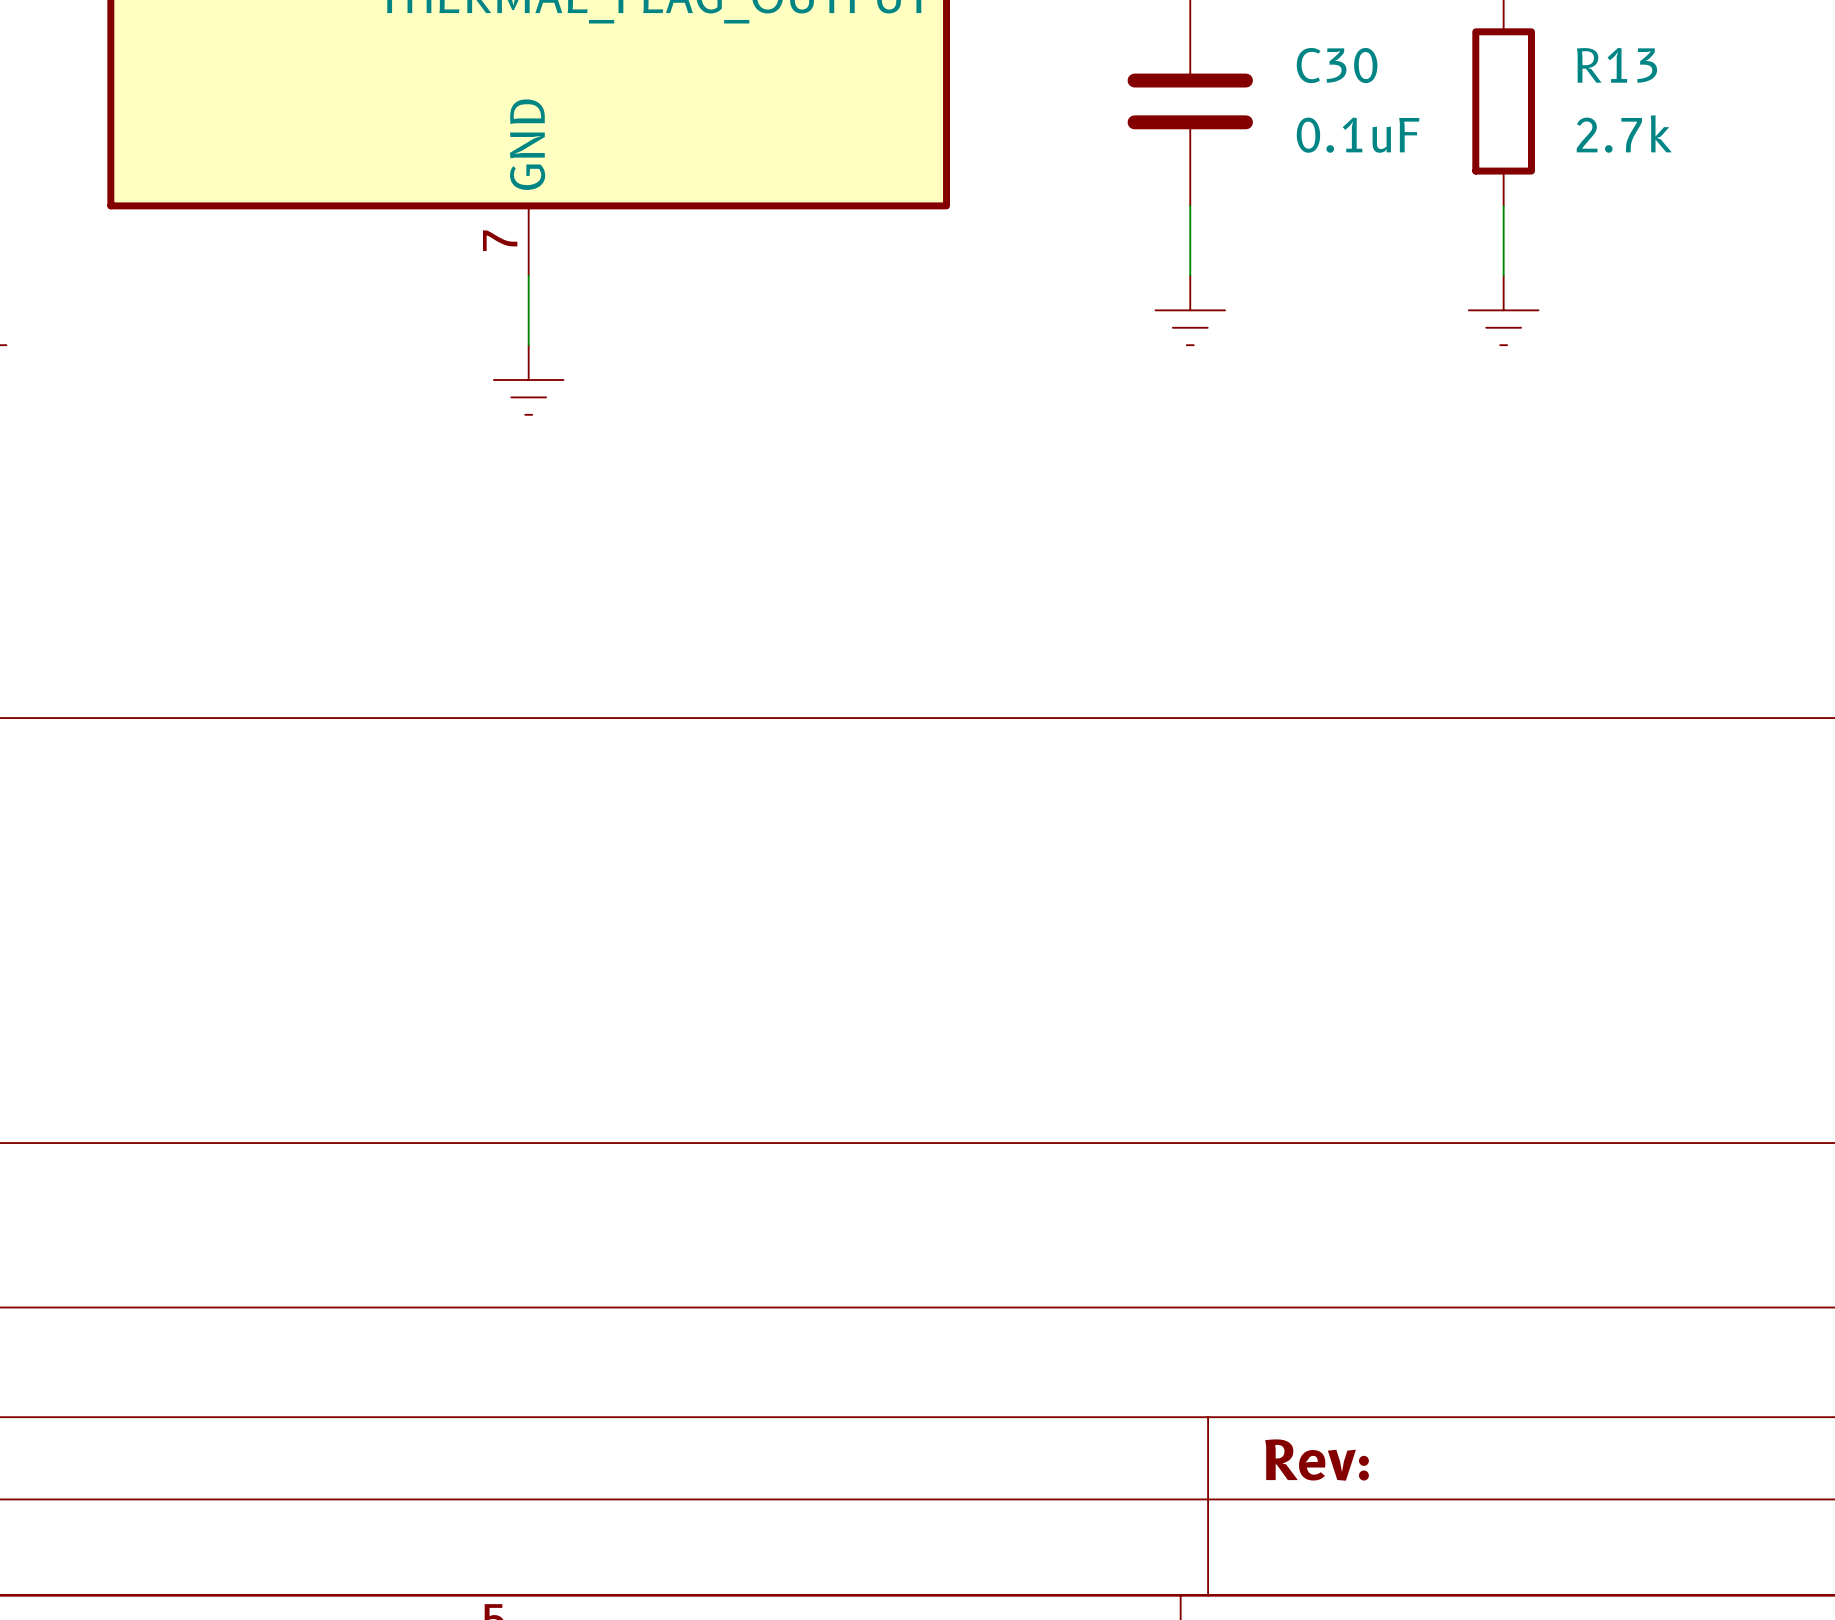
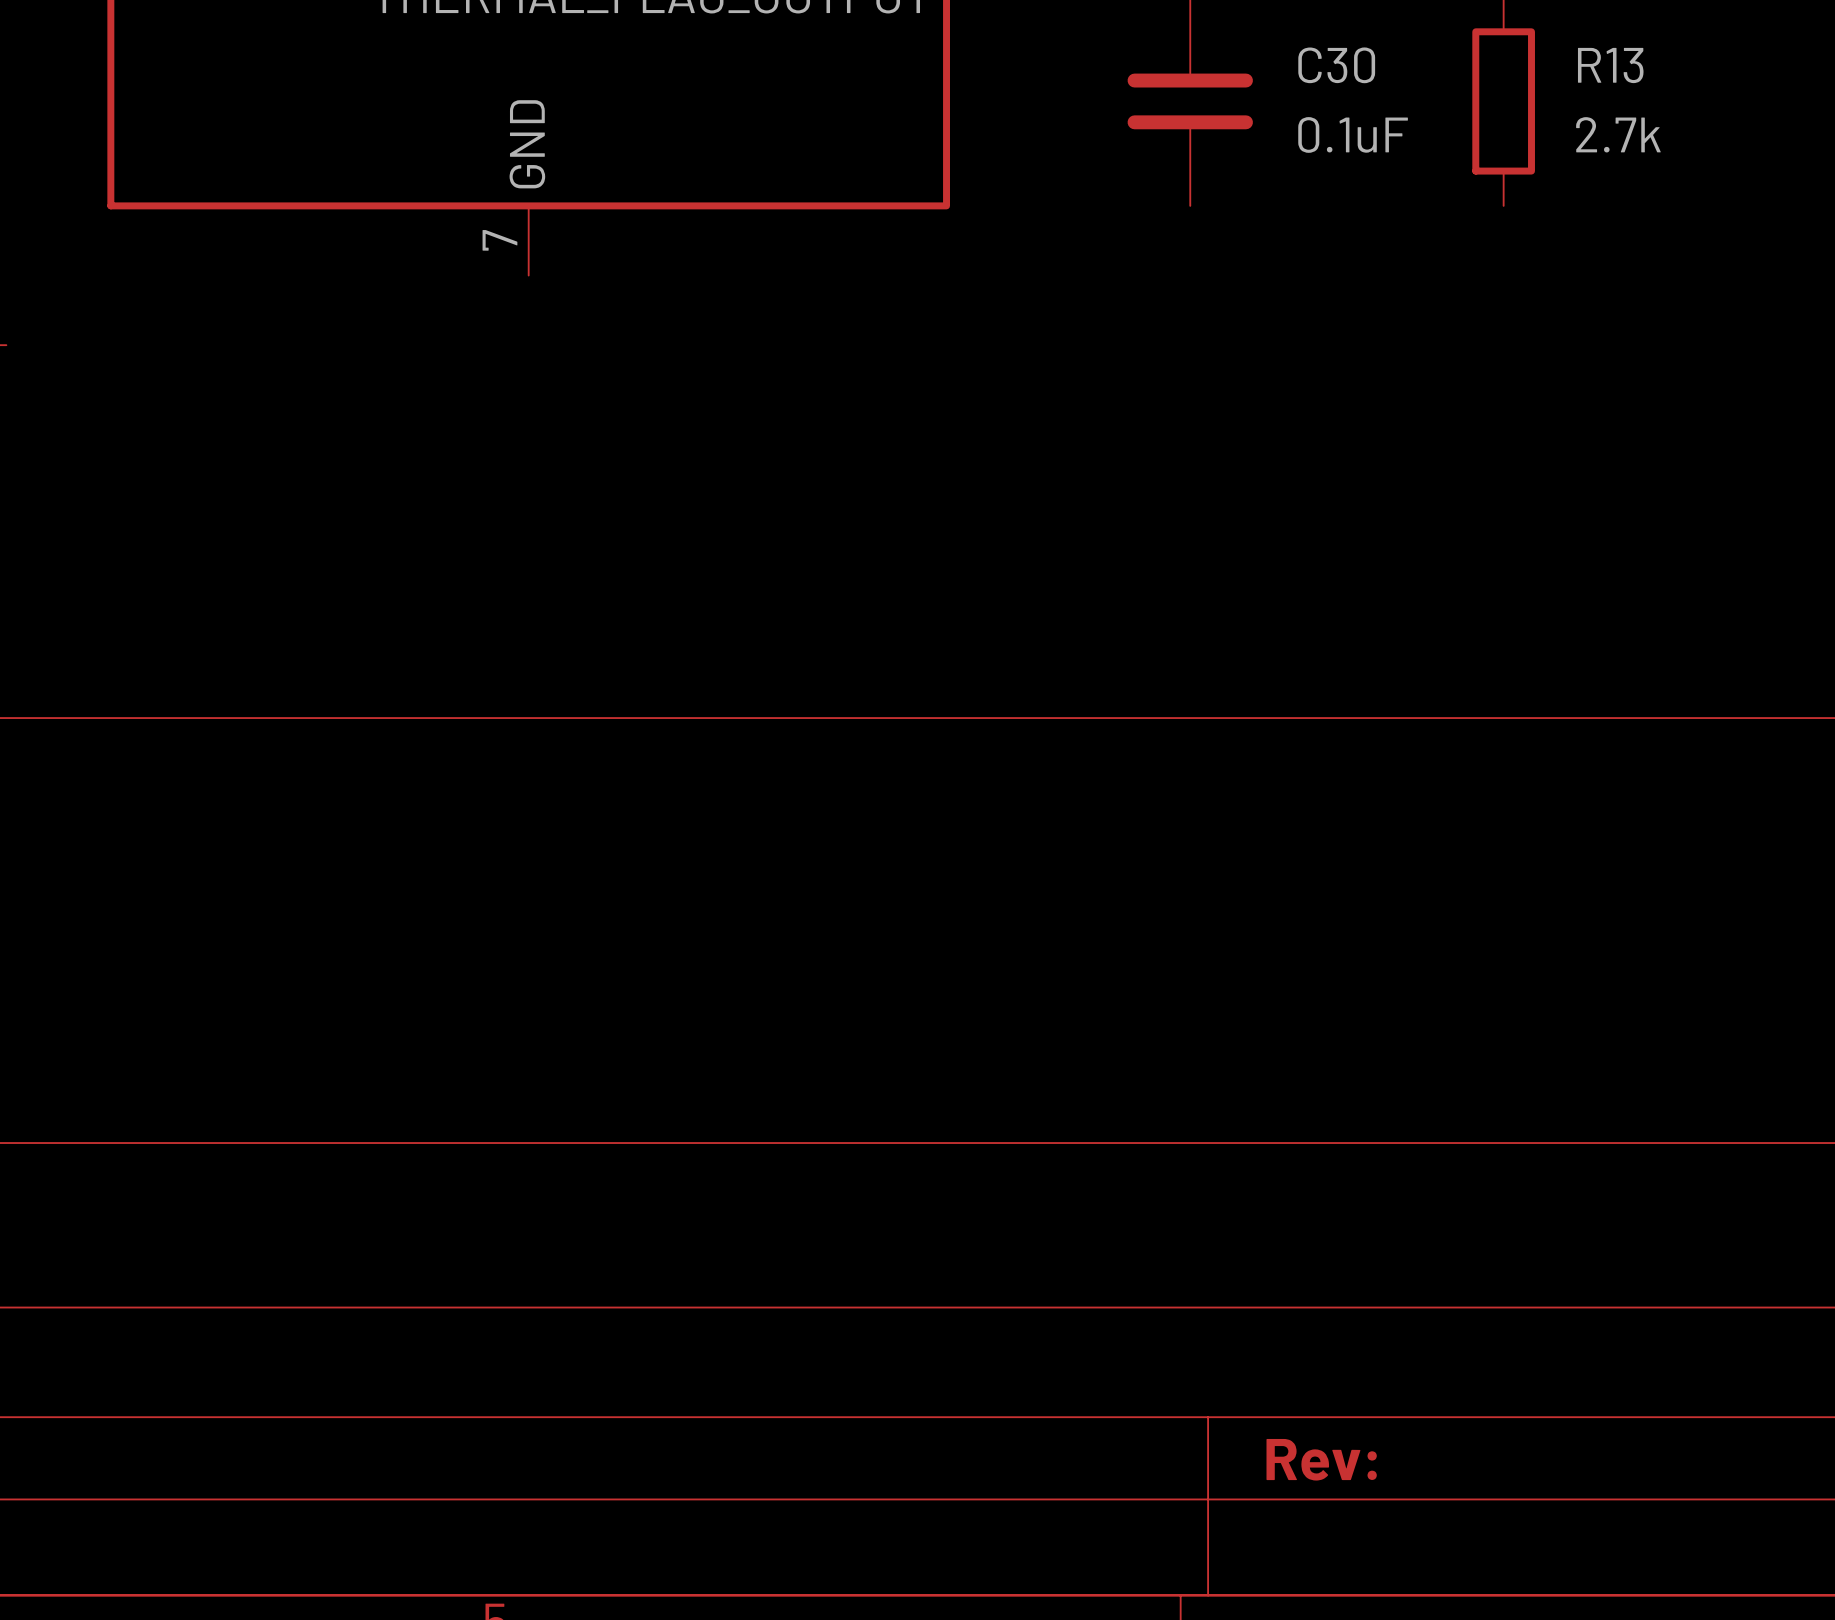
wire: (1190, 205) (1190, 275) -> none
wire: (1503, 205) (1503, 275) -> none
wire: (528, 275) (528, 345) -> none
power symbol: (1190, 310) -> none
power symbol: (1503, 310) -> none
power symbol: (528, 379) -> none

